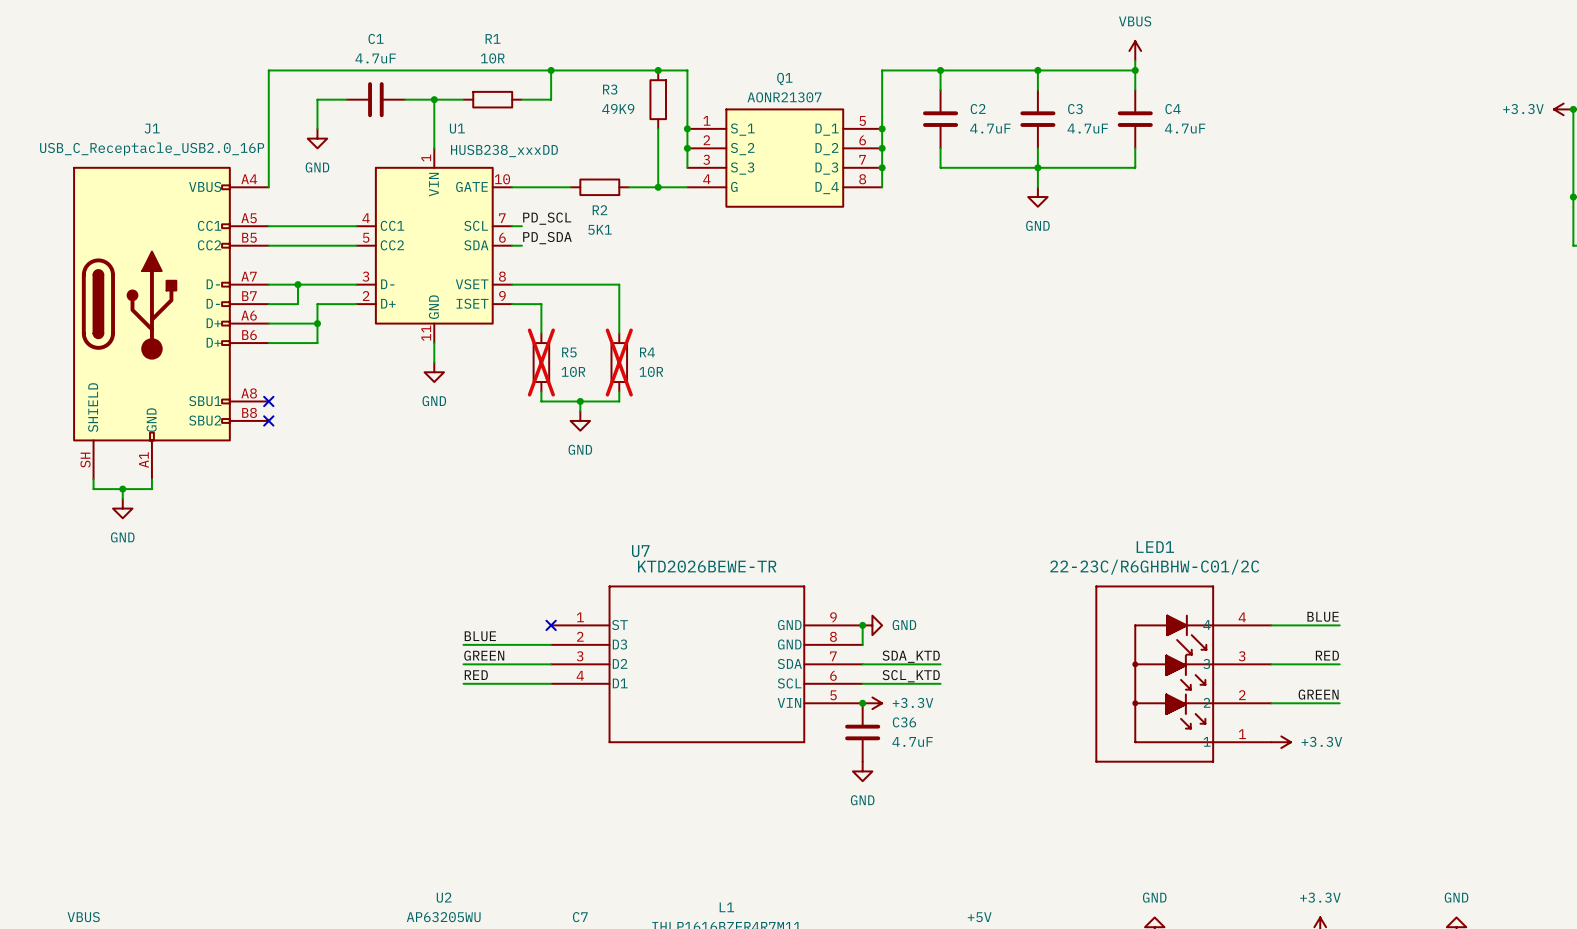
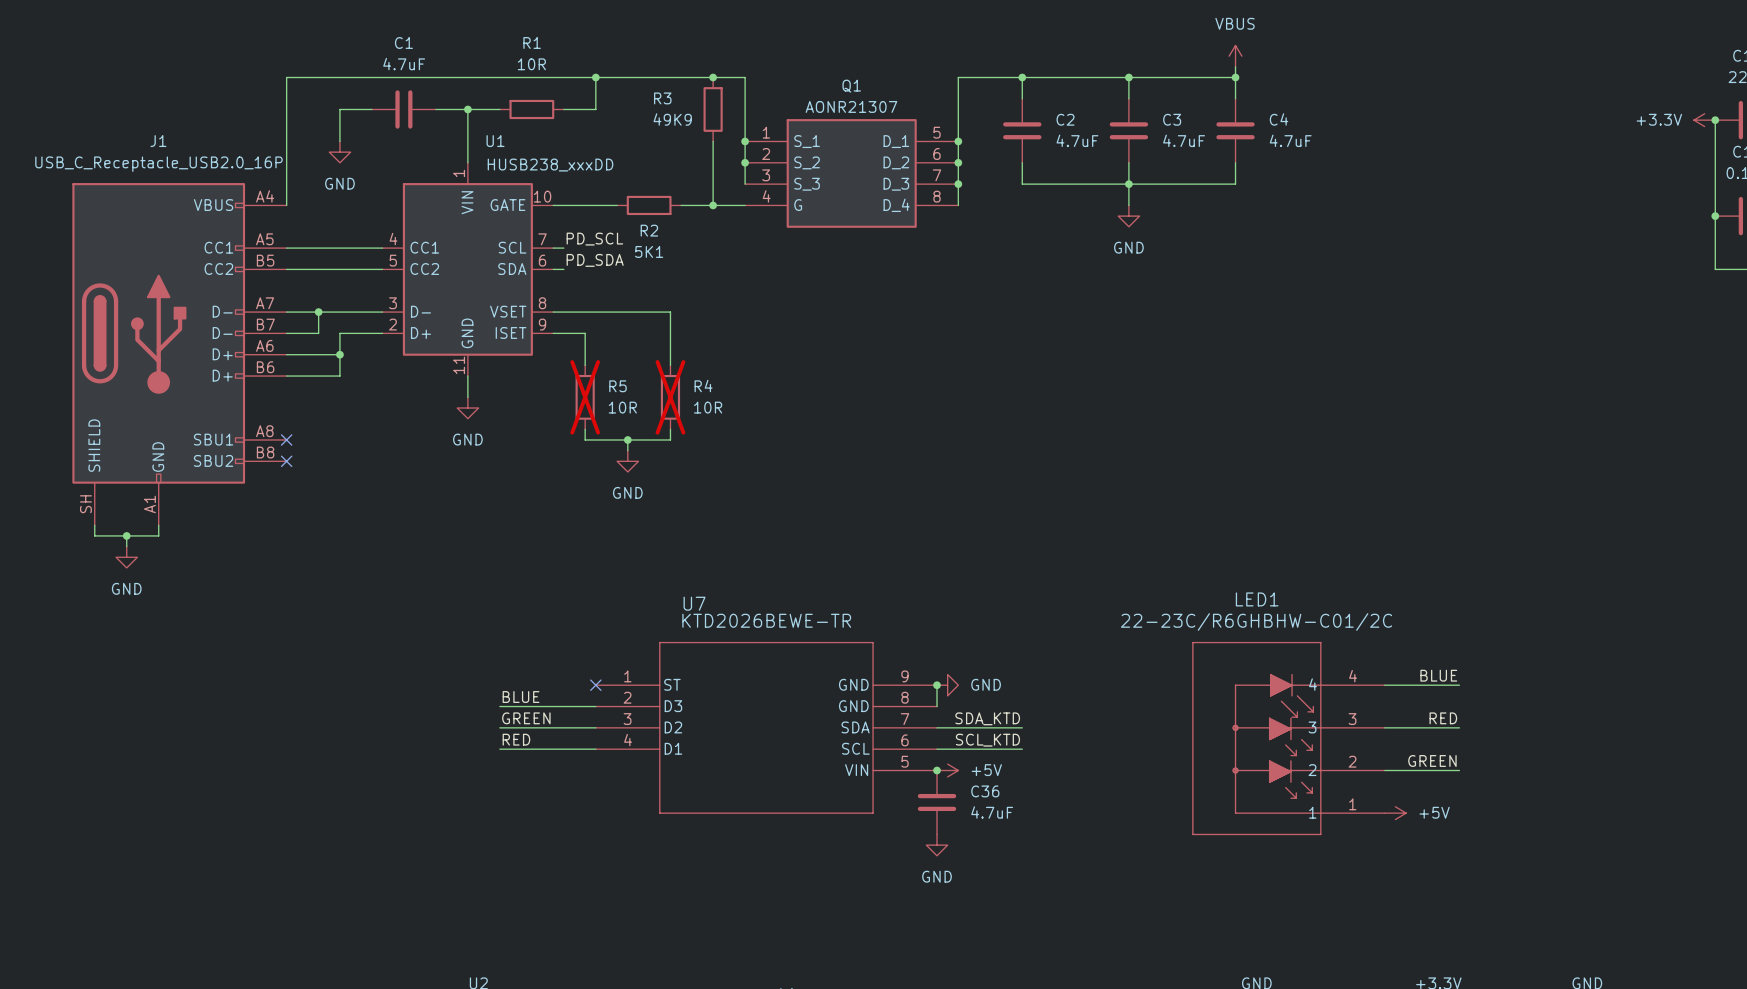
power symbol: +3.3V (872, 703) -> +5V (947, 770)
power symbol: +3.3V (1281, 742) -> +5V (1395, 813)

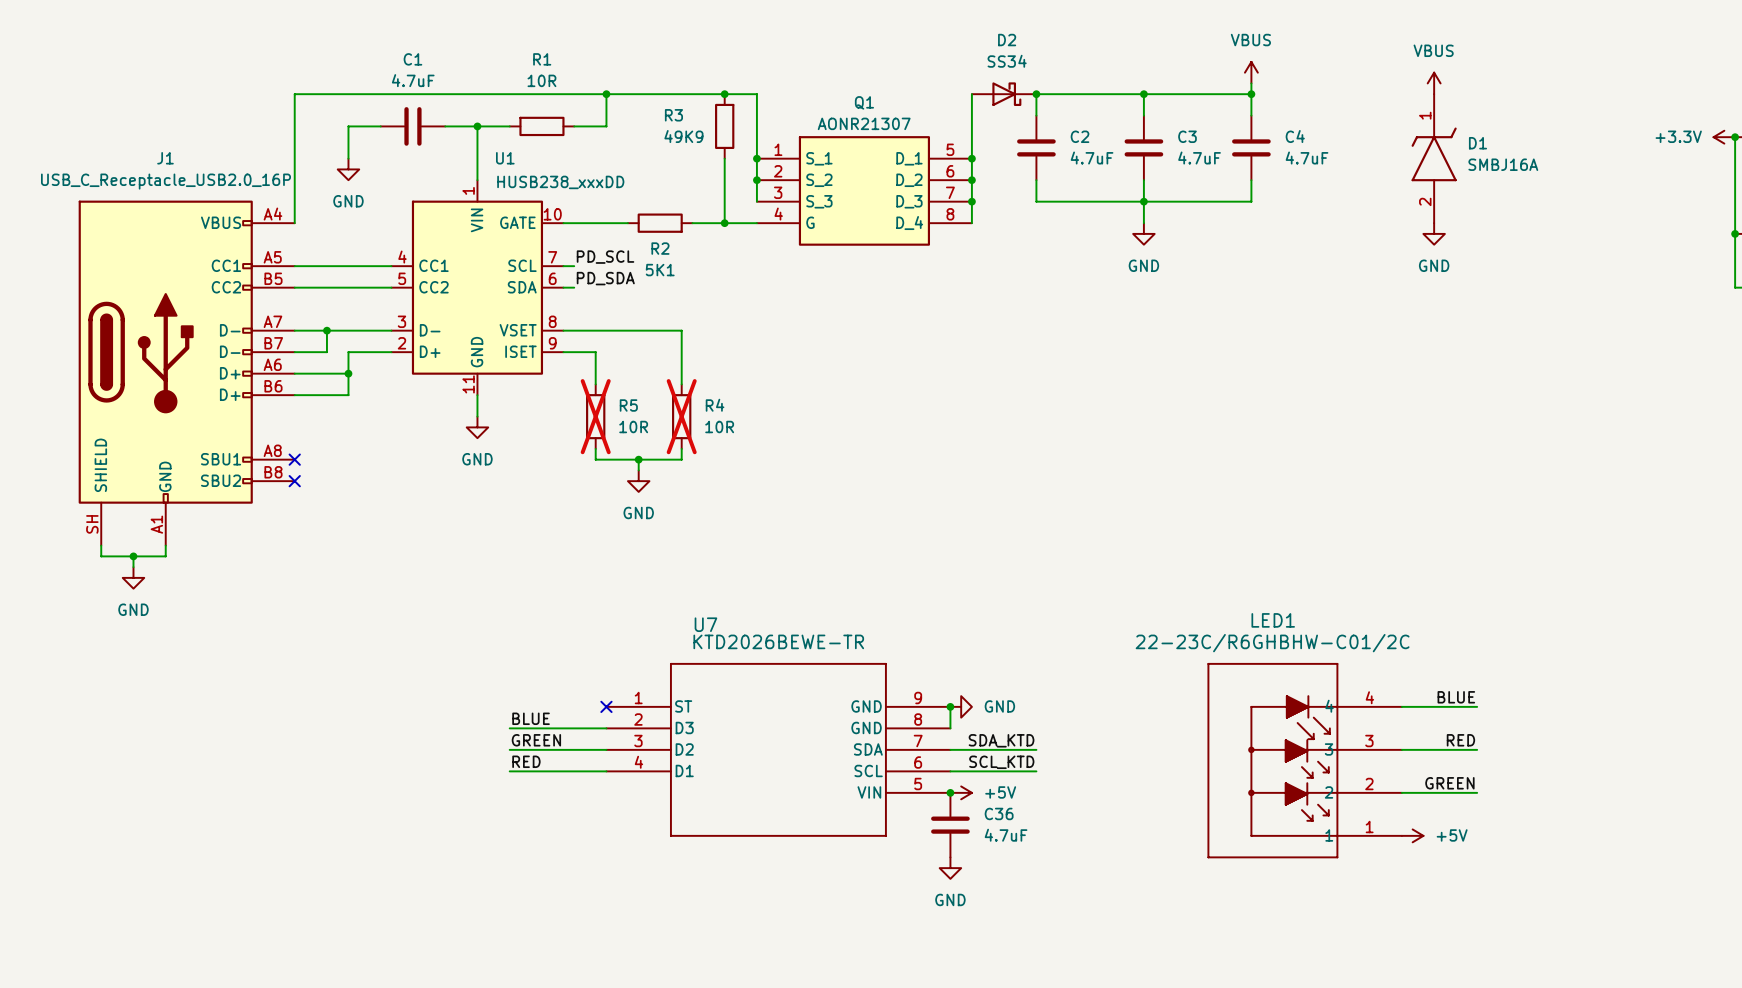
power symbol: none -> VBUS (1434, 83)
D2: none -> SS34 (1004, 94)
D1: none -> SMBJ16A (1434, 158)
power symbol: none -> GND (1434, 233)

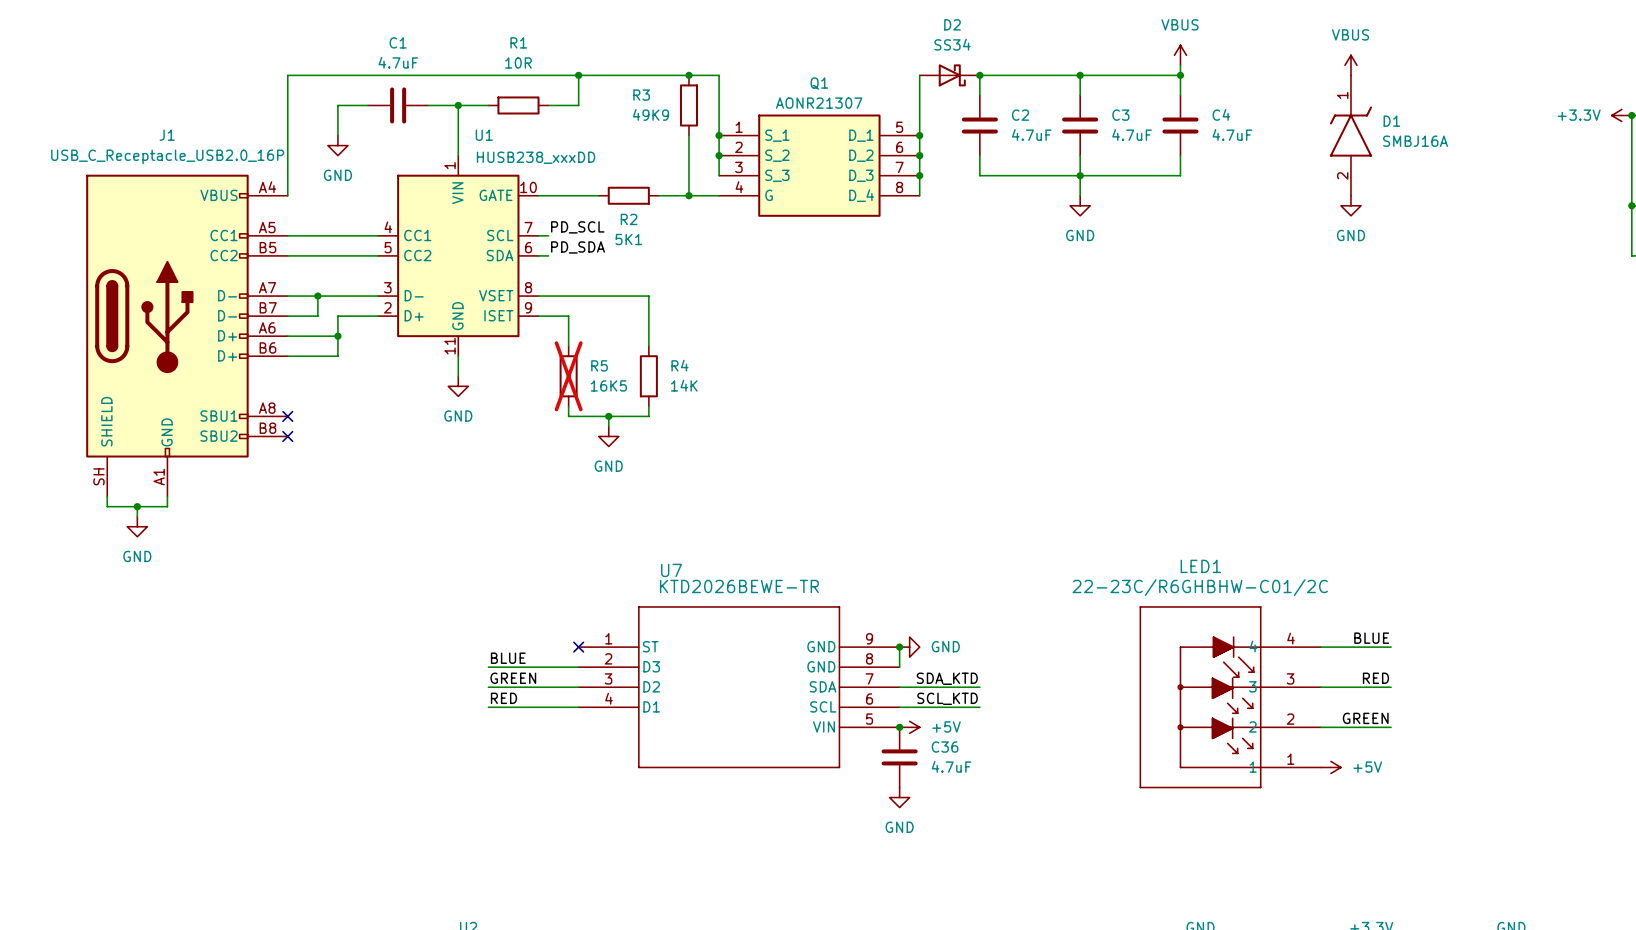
R4 do-not-place cross: (681, 416) -> none
R5 value: 10R (633, 427) -> 16K5 (608, 385)
R4 value: 10R (719, 427) -> 14K (684, 385)

